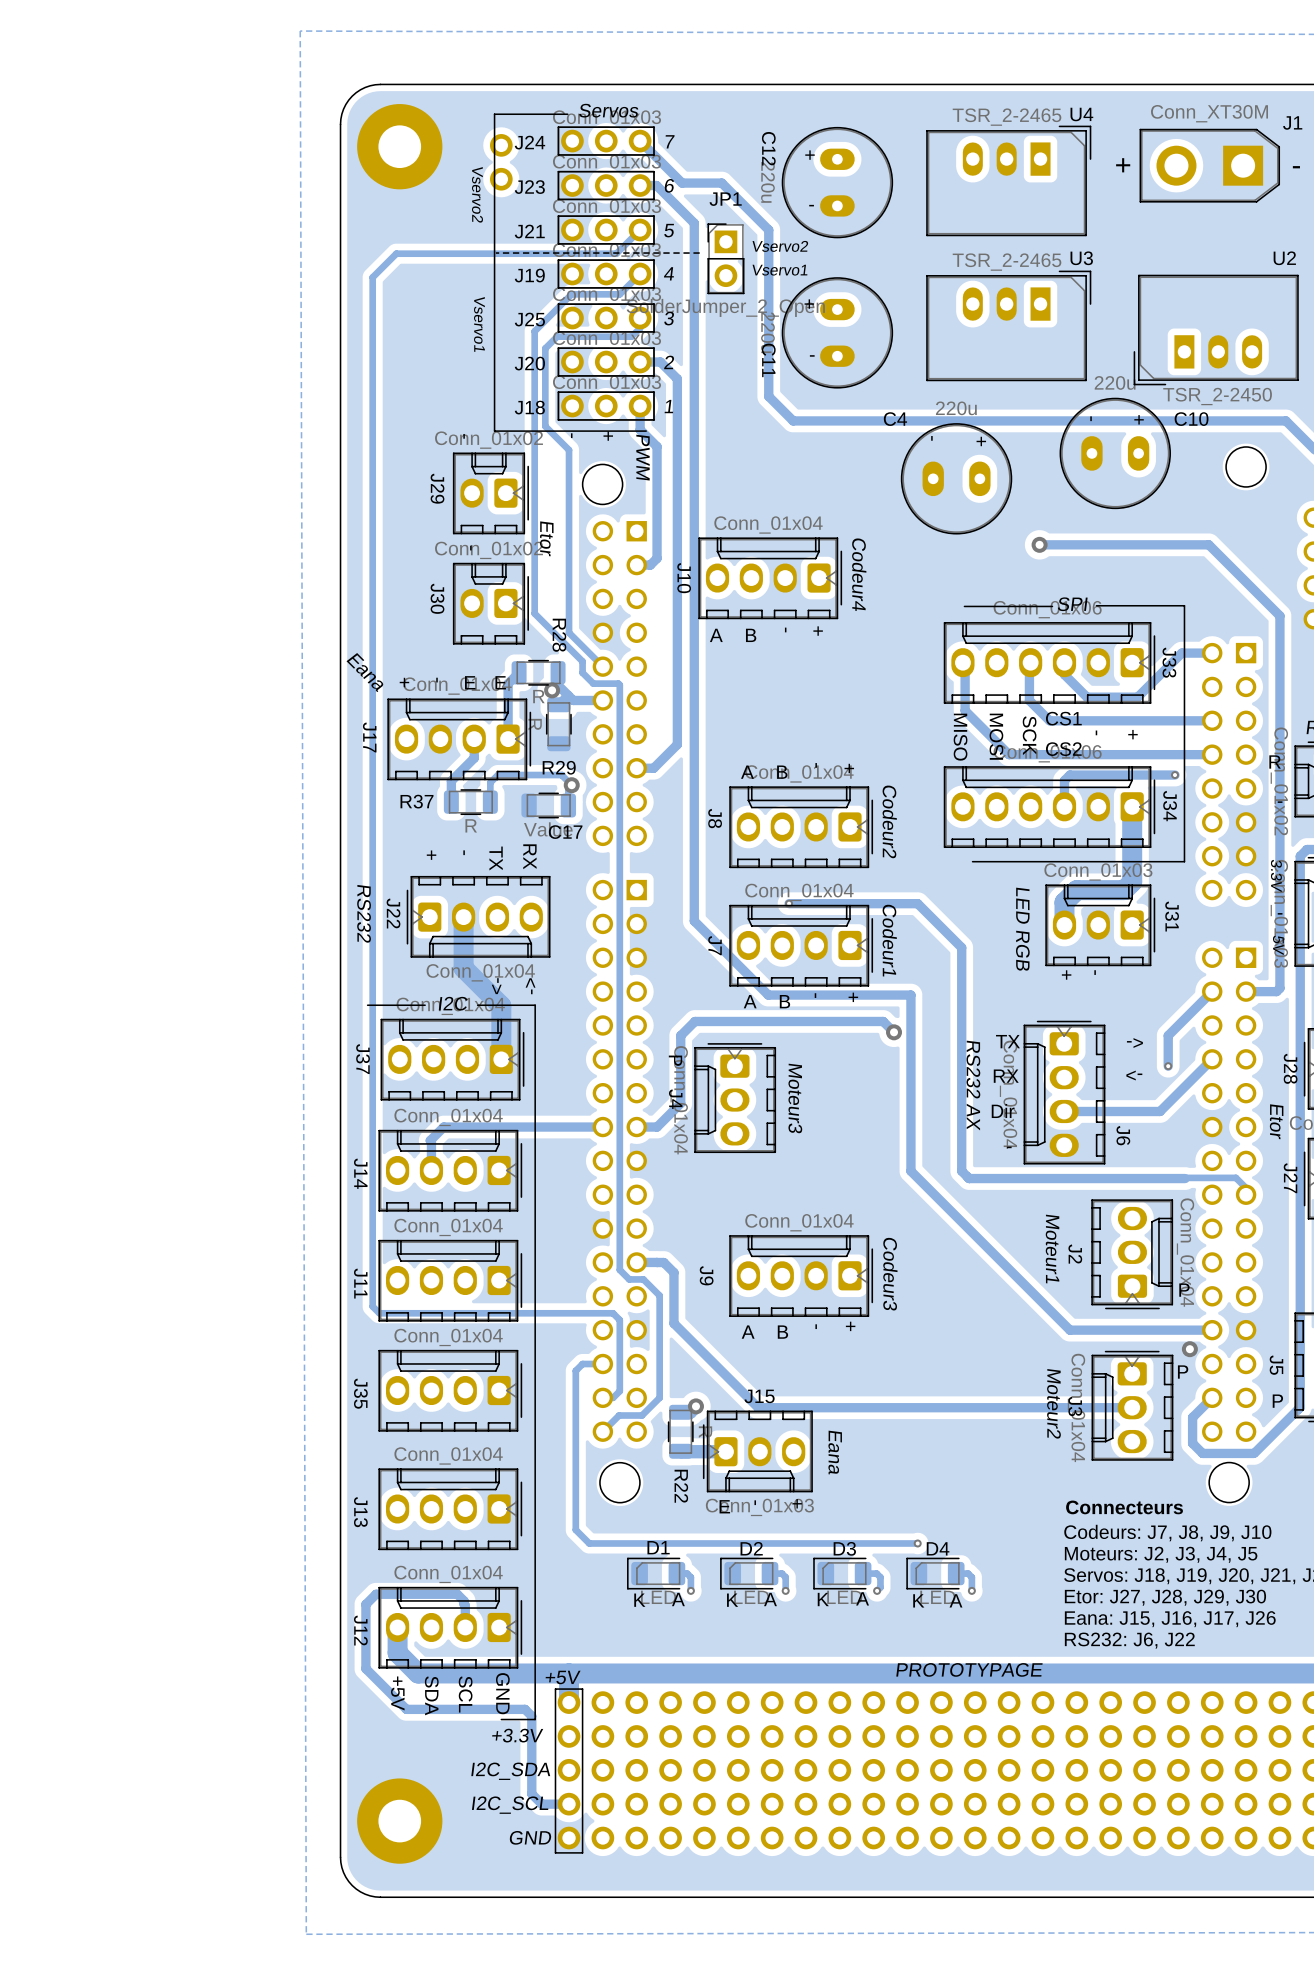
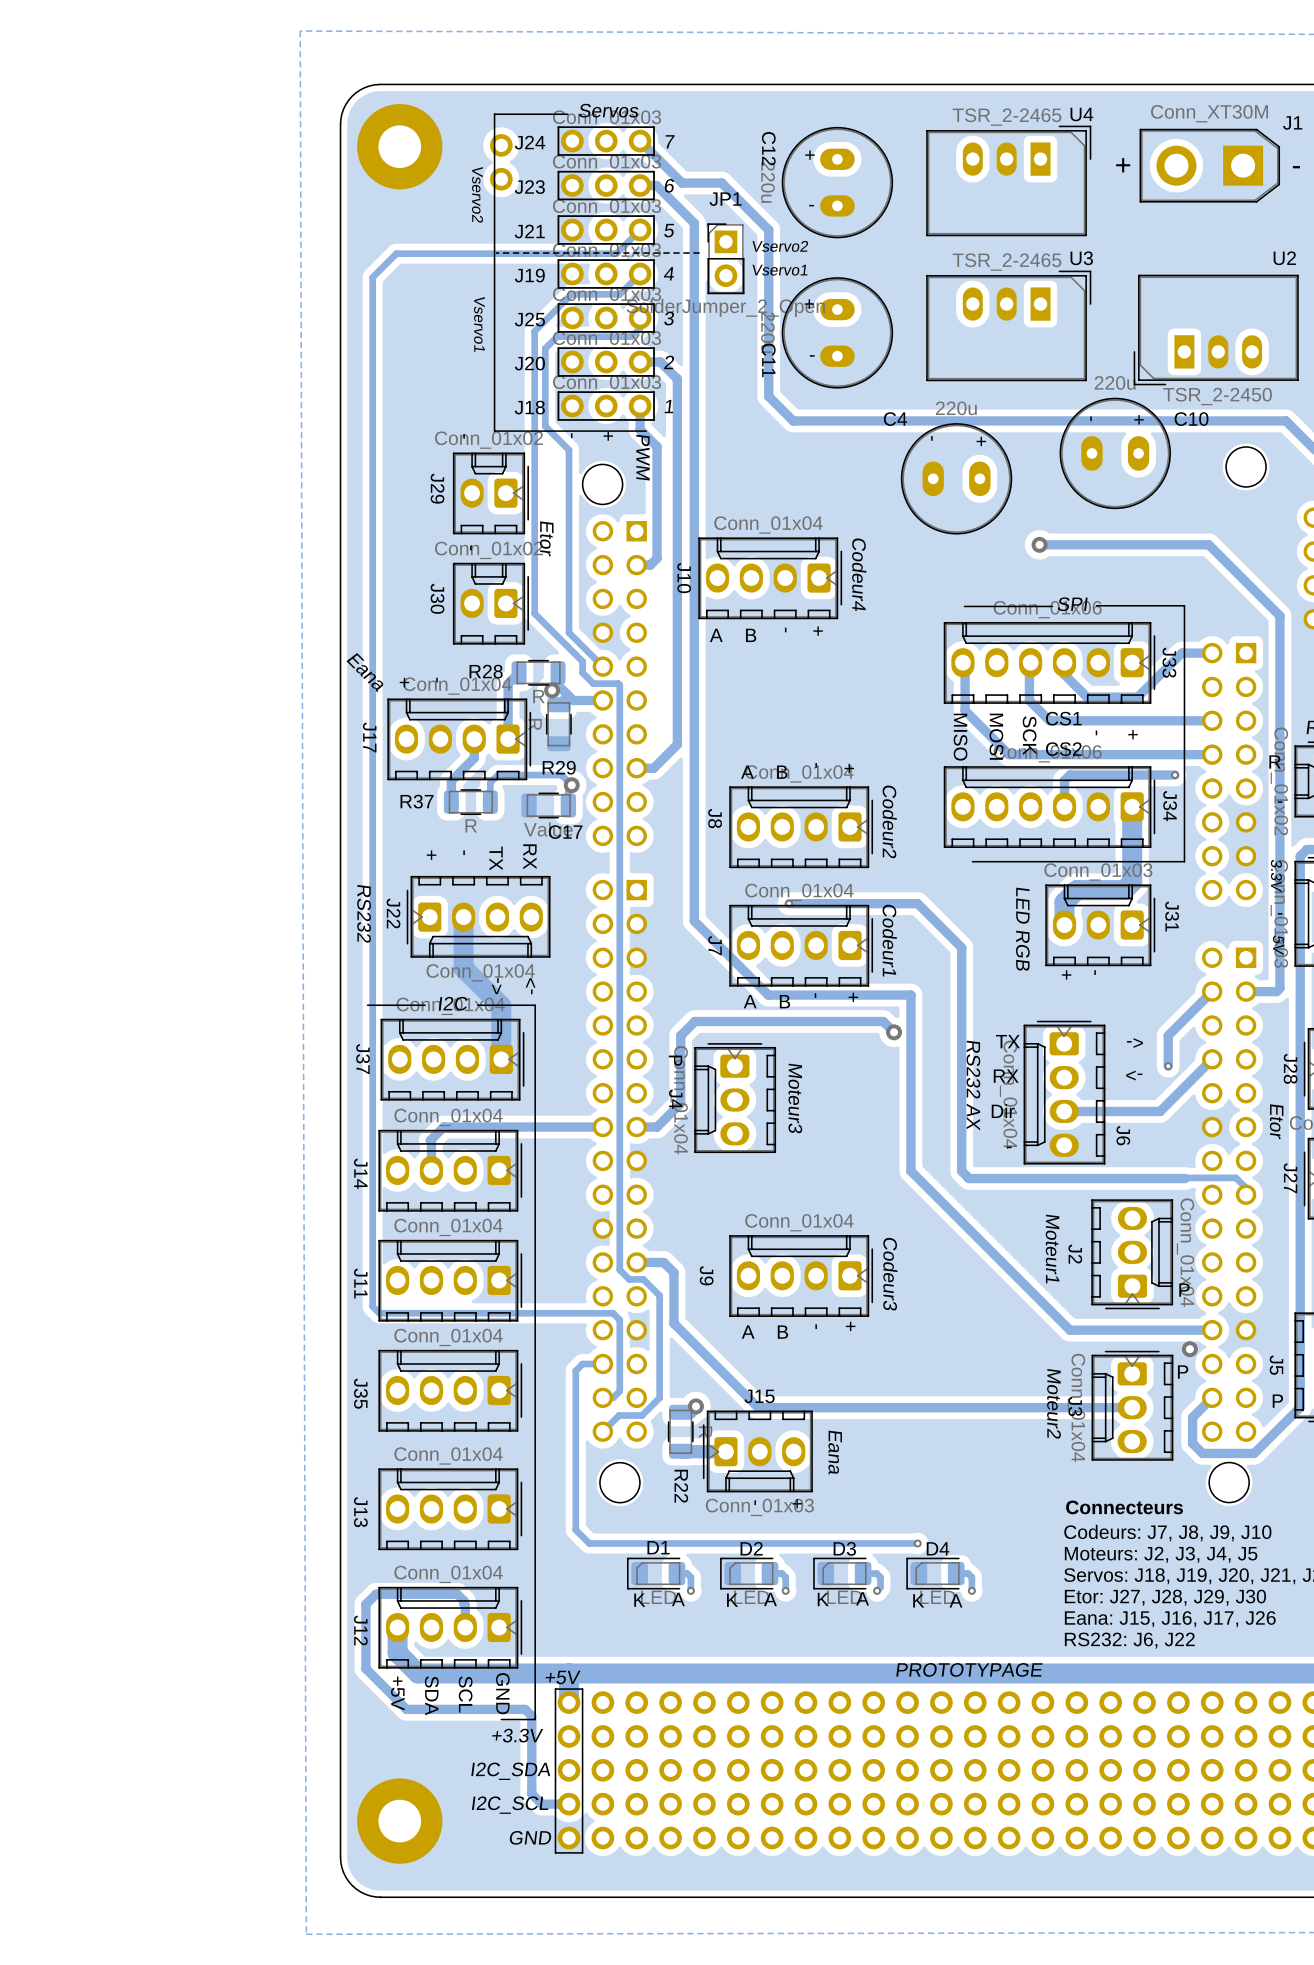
R28 name rotation: 0° (559, 635) -> 90° counterclockwise (486, 671)
R28 name position: R28 (559, 635) -> R28 (486, 671)
text: E (470, 682) -> none
text: E (500, 682) -> none
text: E (724, 1506) -> none

